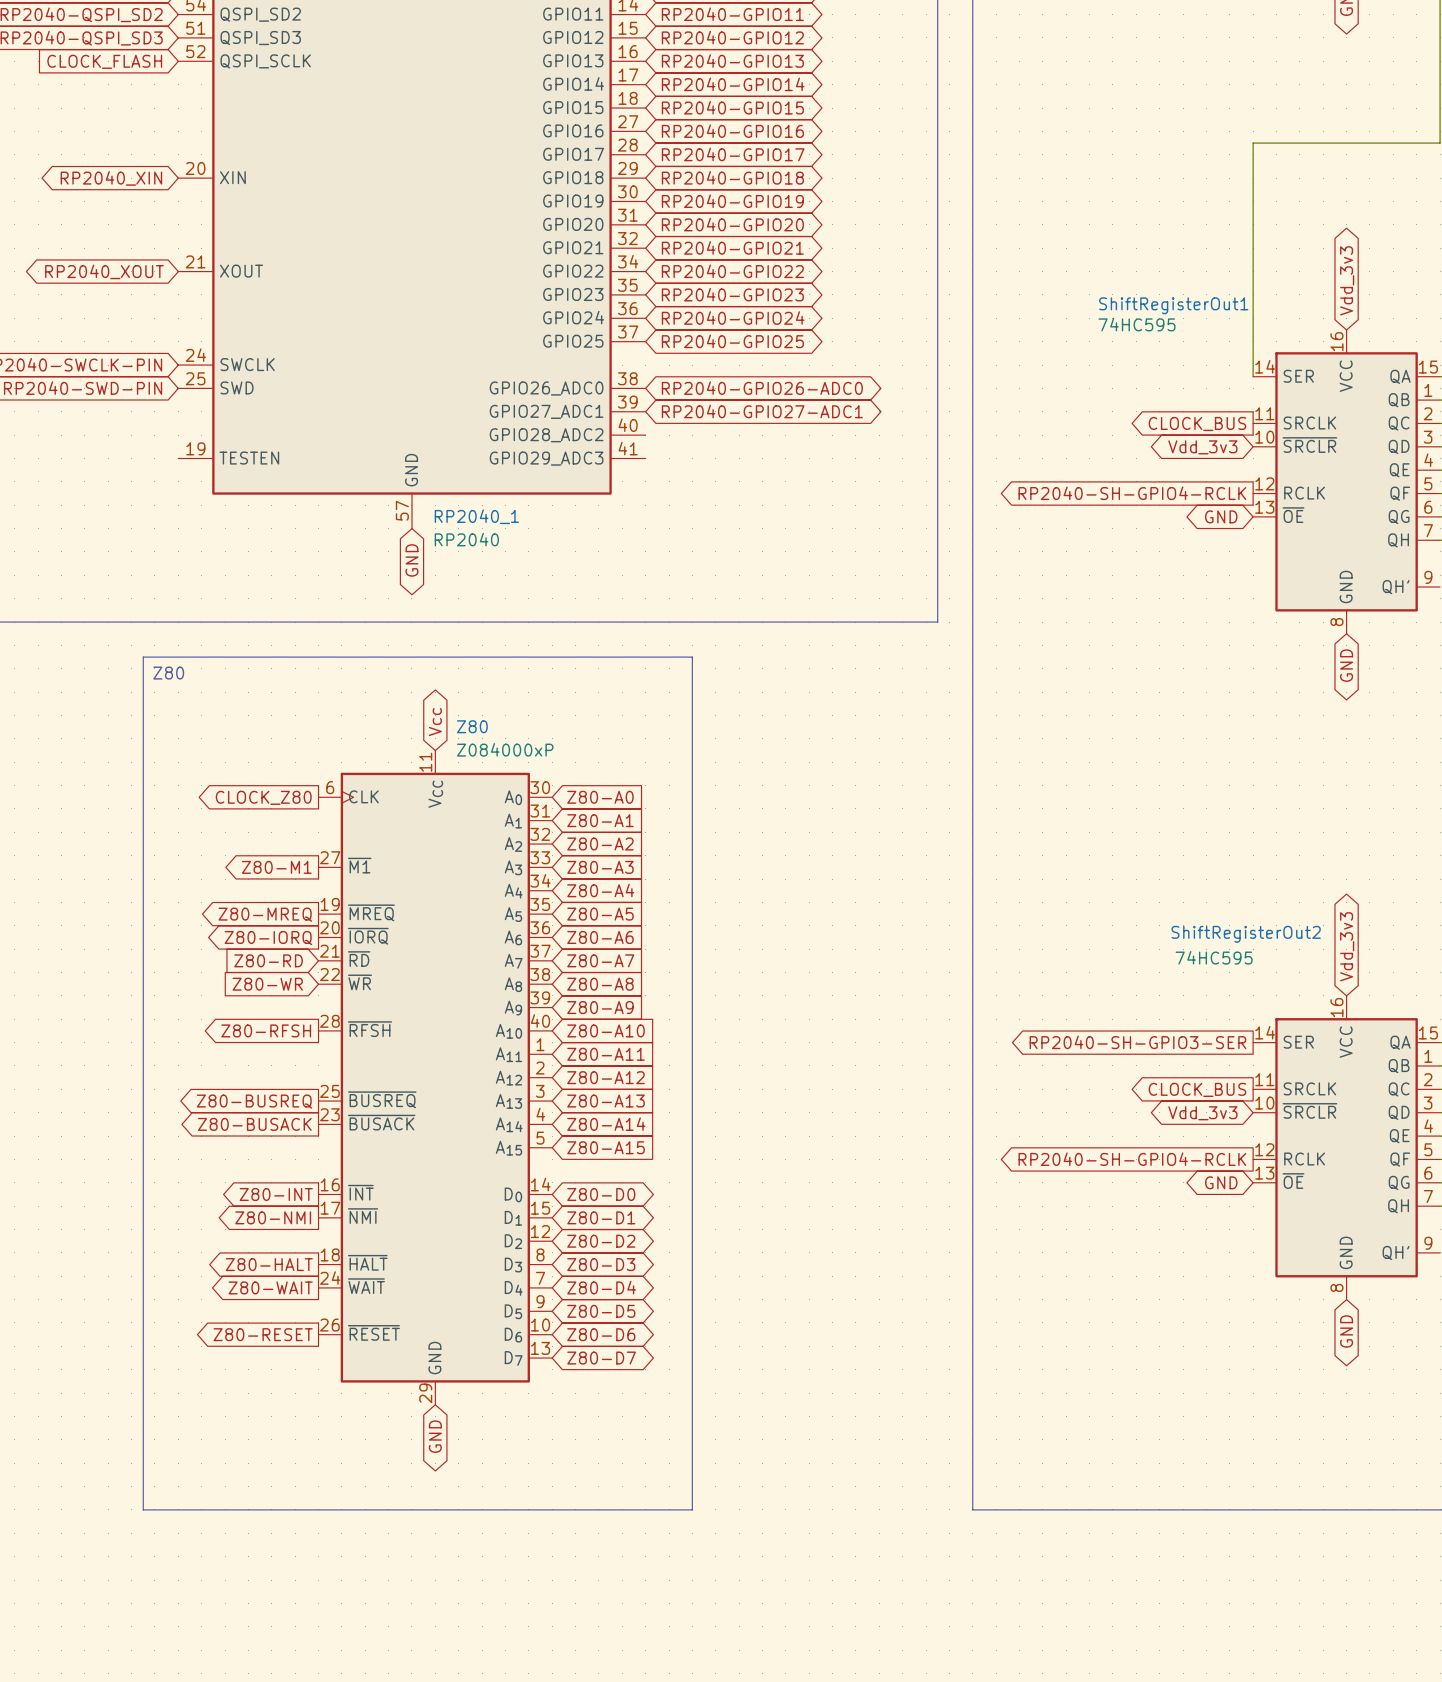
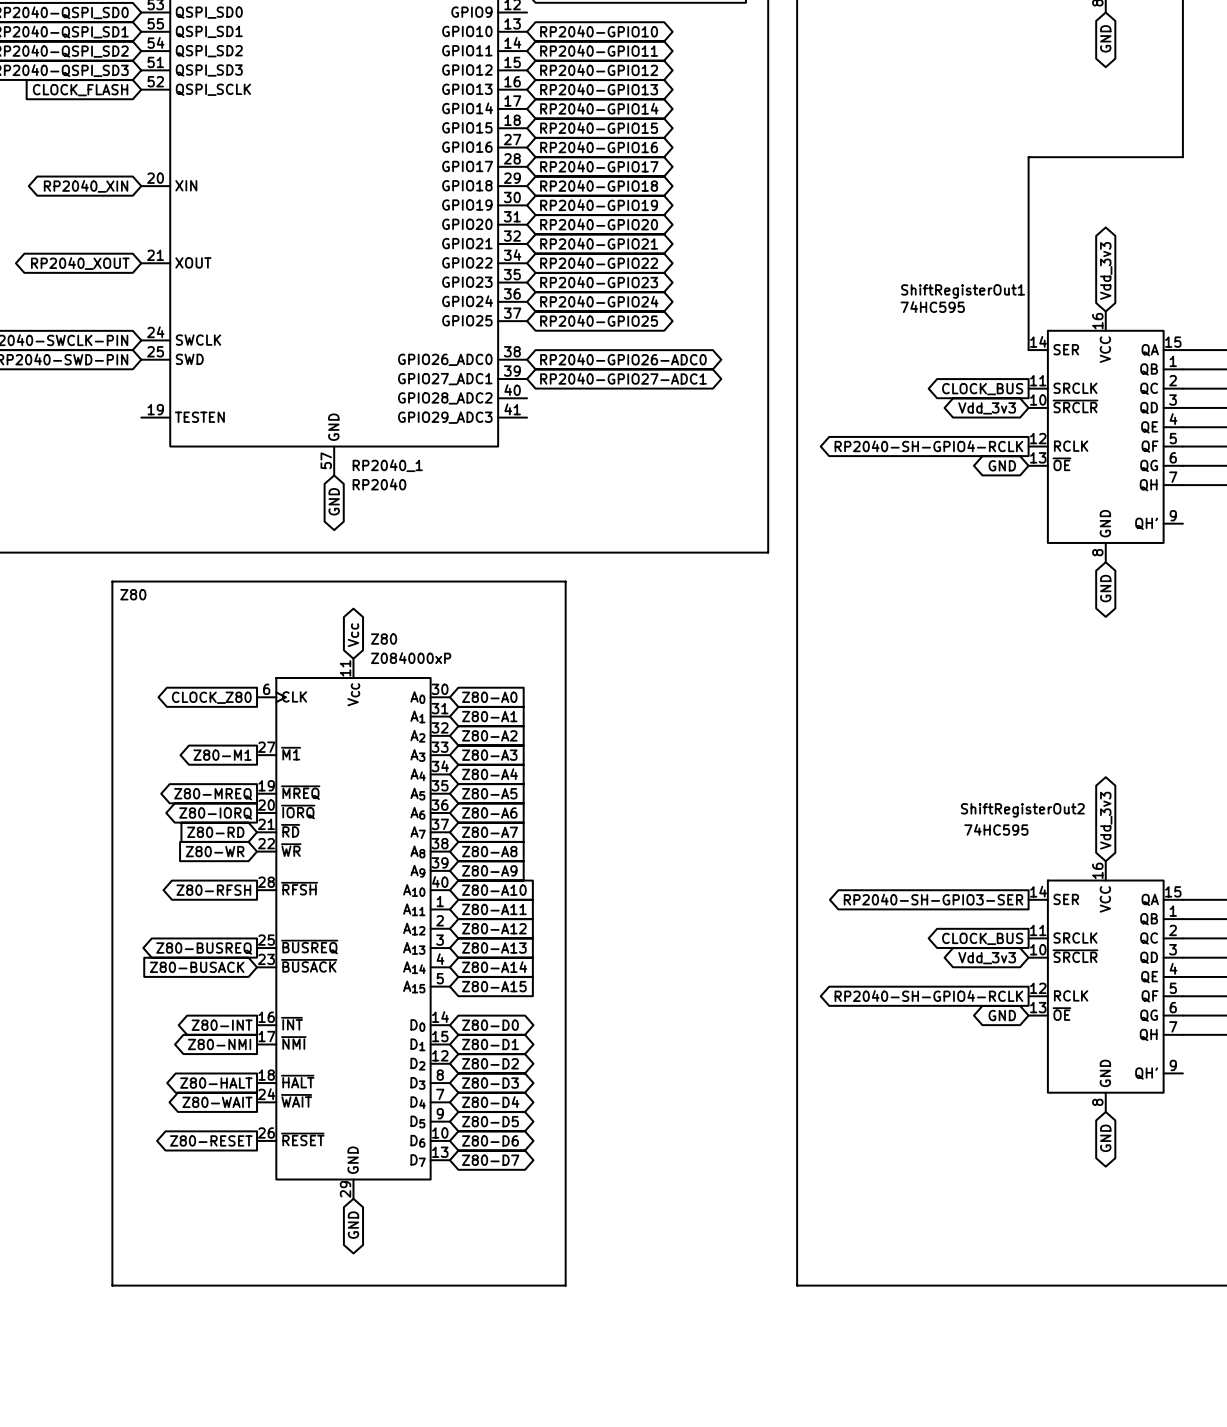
global label shape: output (254, 1124) -> input (197, 967)

